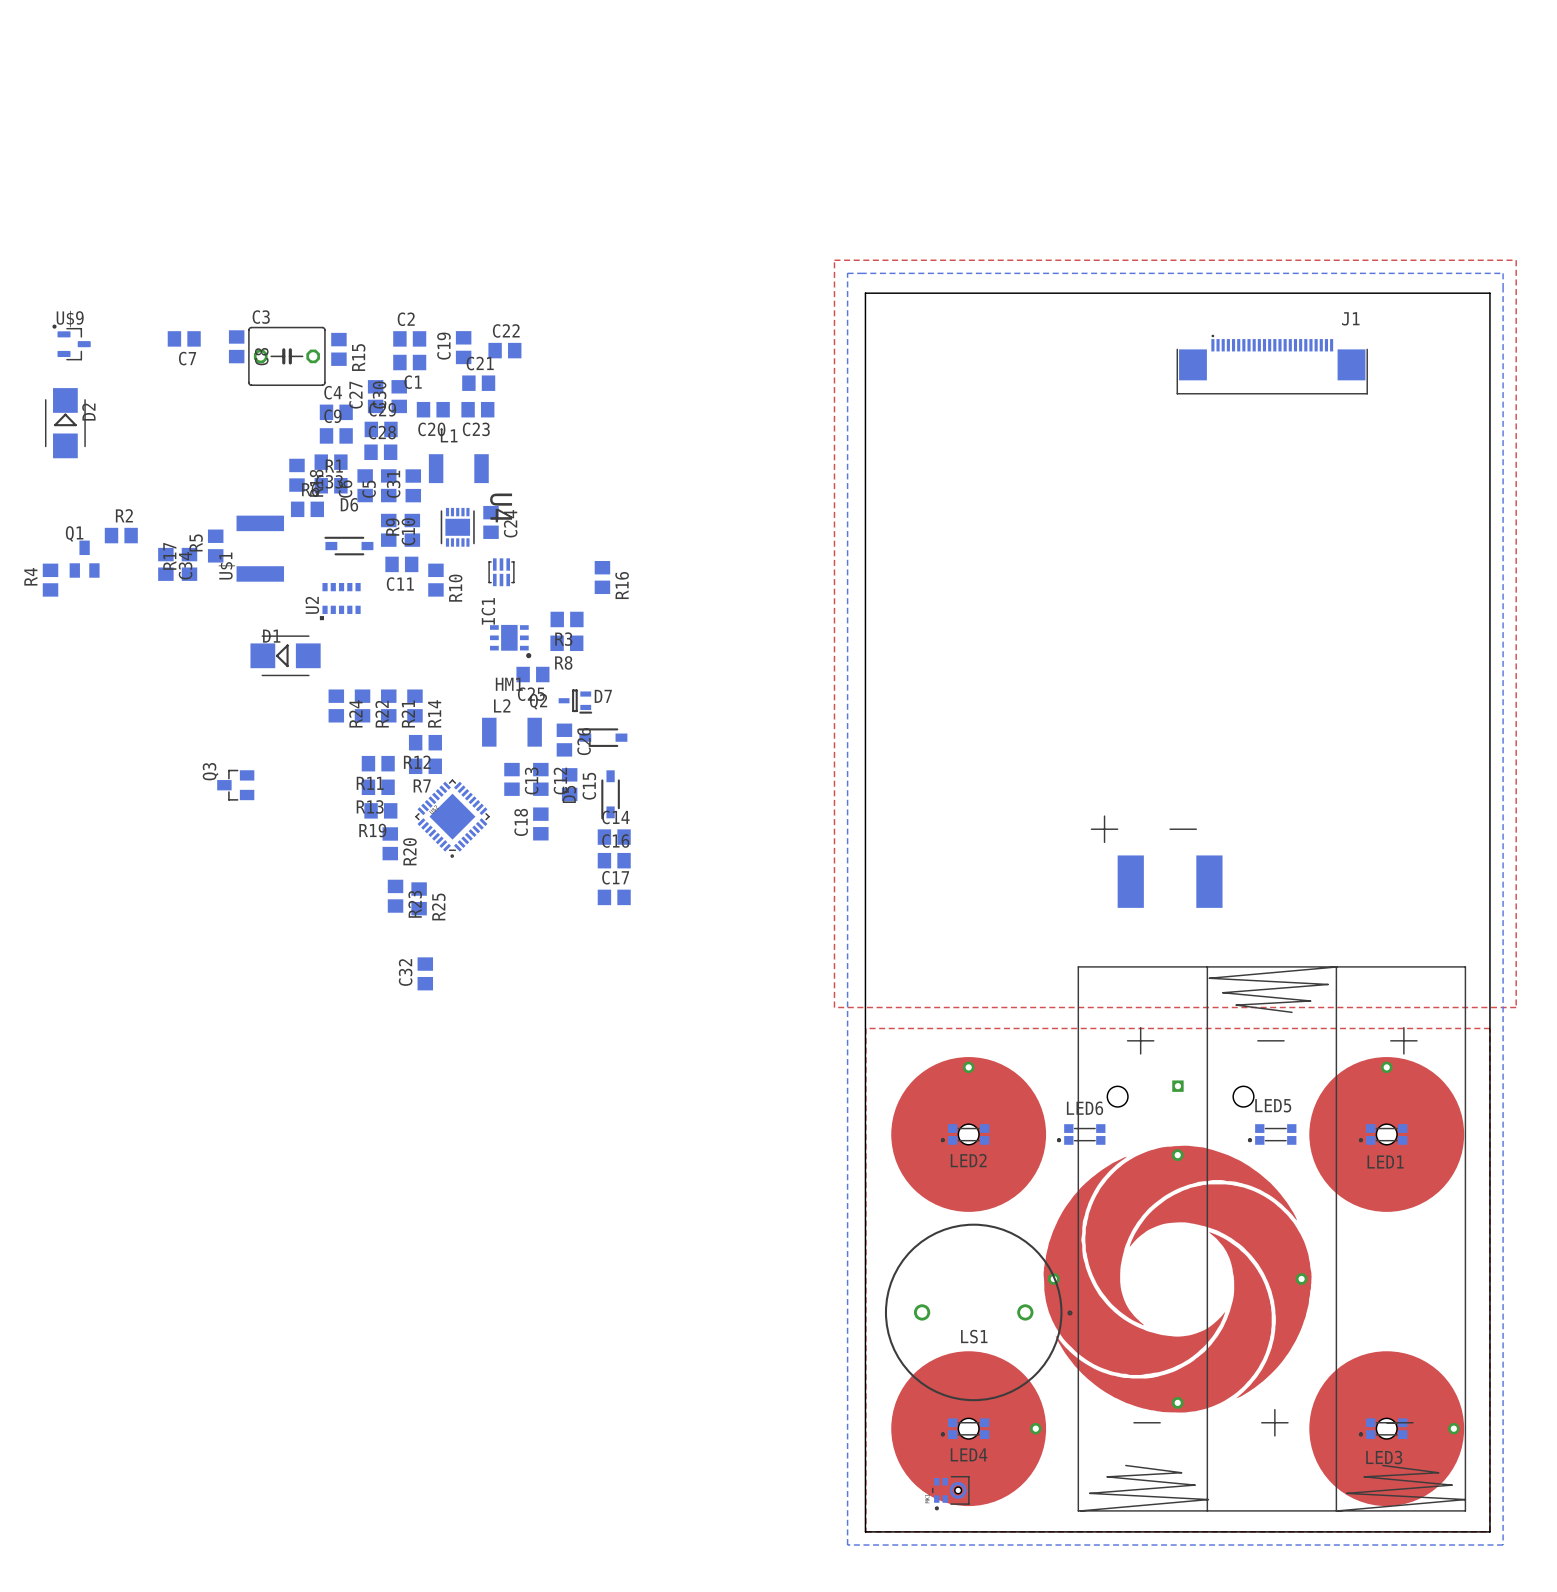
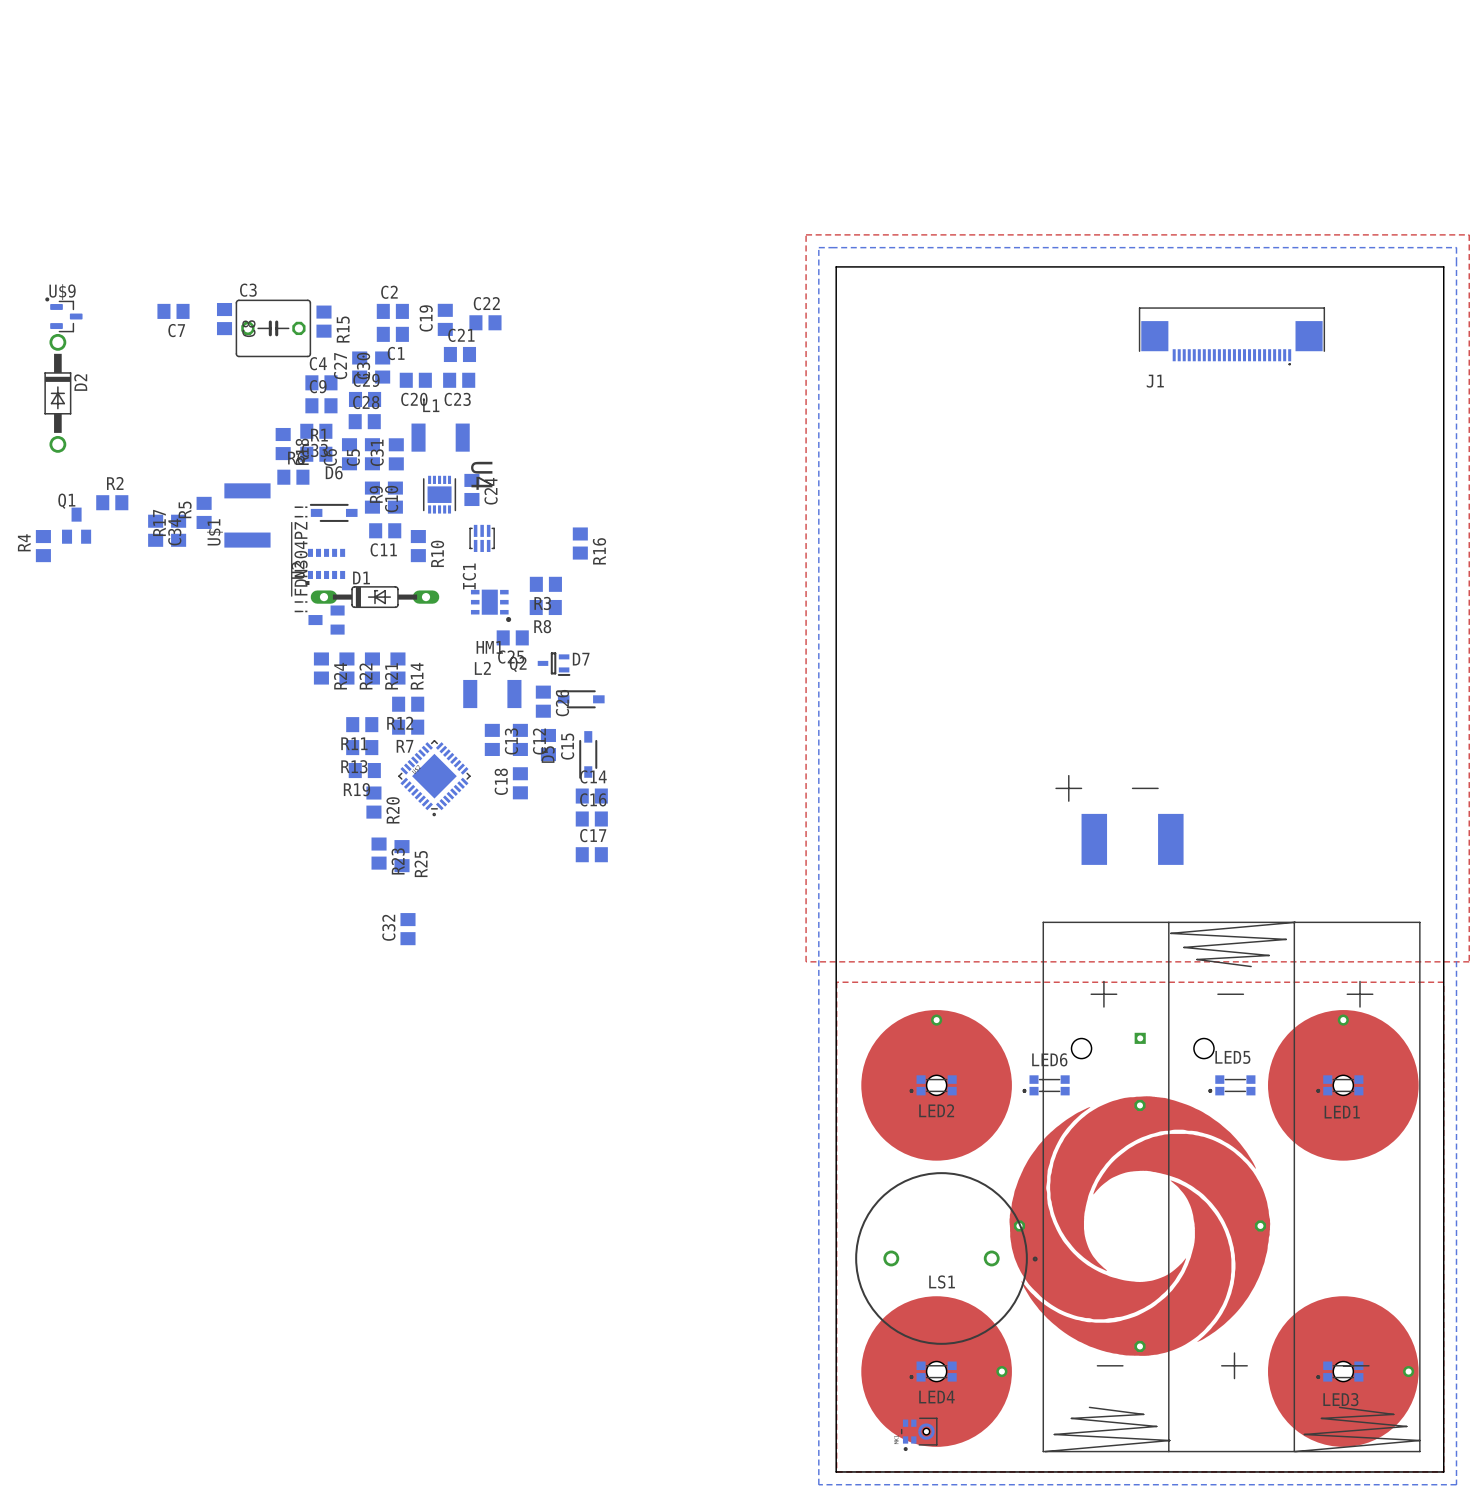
J1 rotation: 0° (1272, 364) -> 180° (1231, 336)
D2 footprint: [45, 388, 86, 459] -> [44, 333, 72, 453]
D1 footprint: [250, 635, 321, 676] -> [310, 586, 440, 609]
!!~{FDN304PZ}!!: none -> (326, 620)
Q3: (235, 785) -> none

